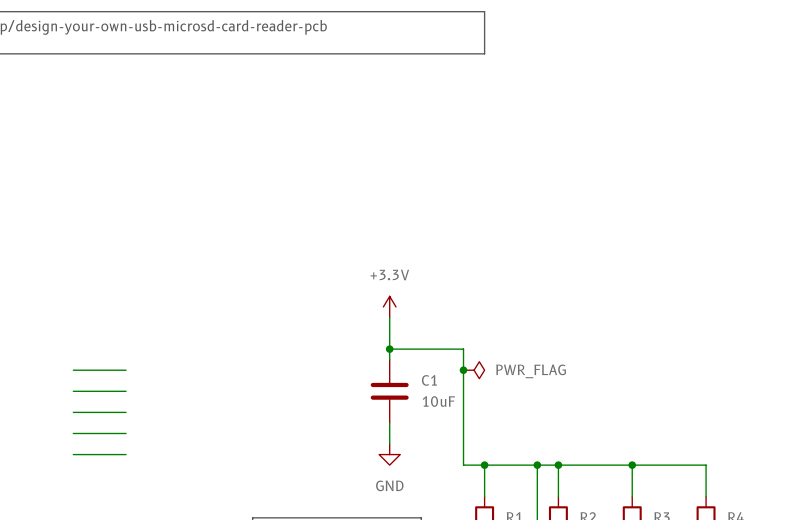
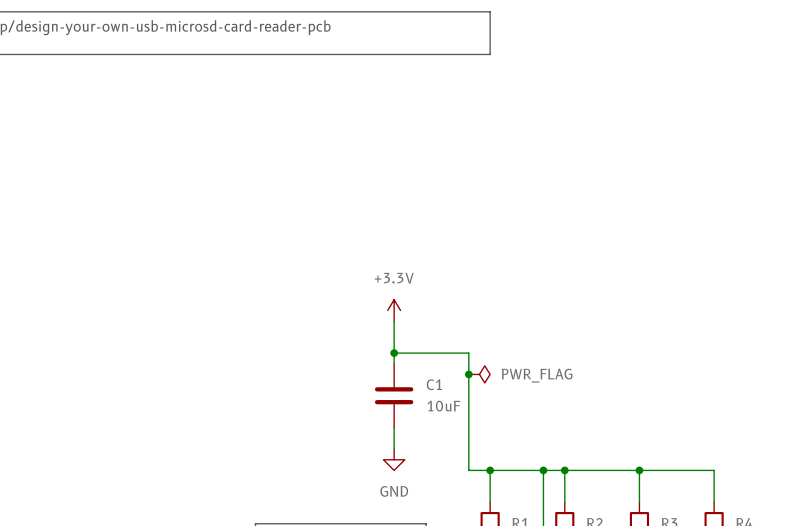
wire: (73, 370) (126, 370) -> none
wire: (73, 391) (126, 391) -> none
wire: (73, 412) (126, 412) -> none
wire: (73, 433) (126, 433) -> none
wire: (73, 454) (126, 454) -> none

